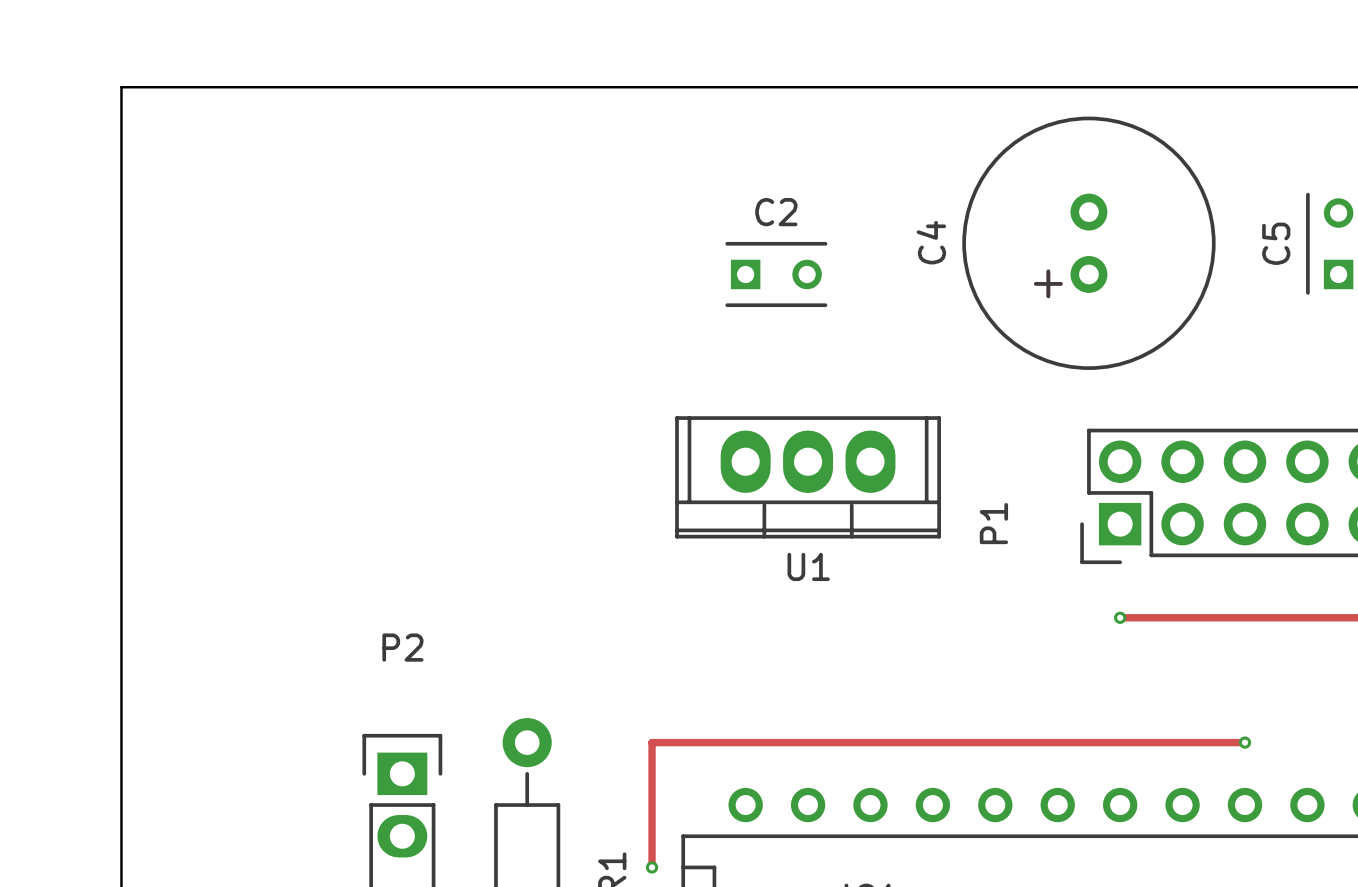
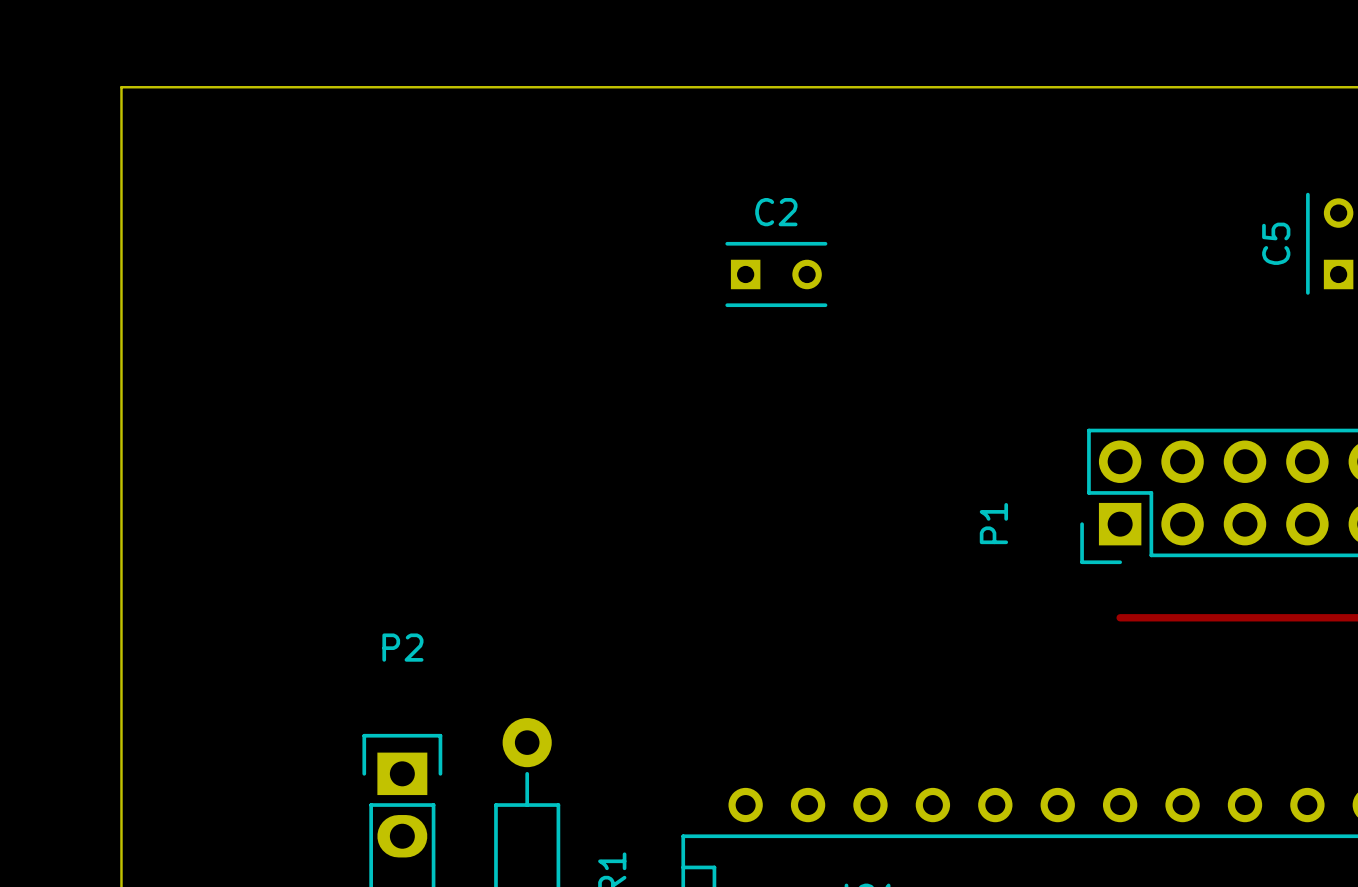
C4: (1088, 243) -> none
U1: (808, 477) -> none
via: (1120, 617) -> none
track: (1244, 742) (652, 742) (652, 867) -> none
via: (1244, 742) -> none
via: (652, 867) -> none

